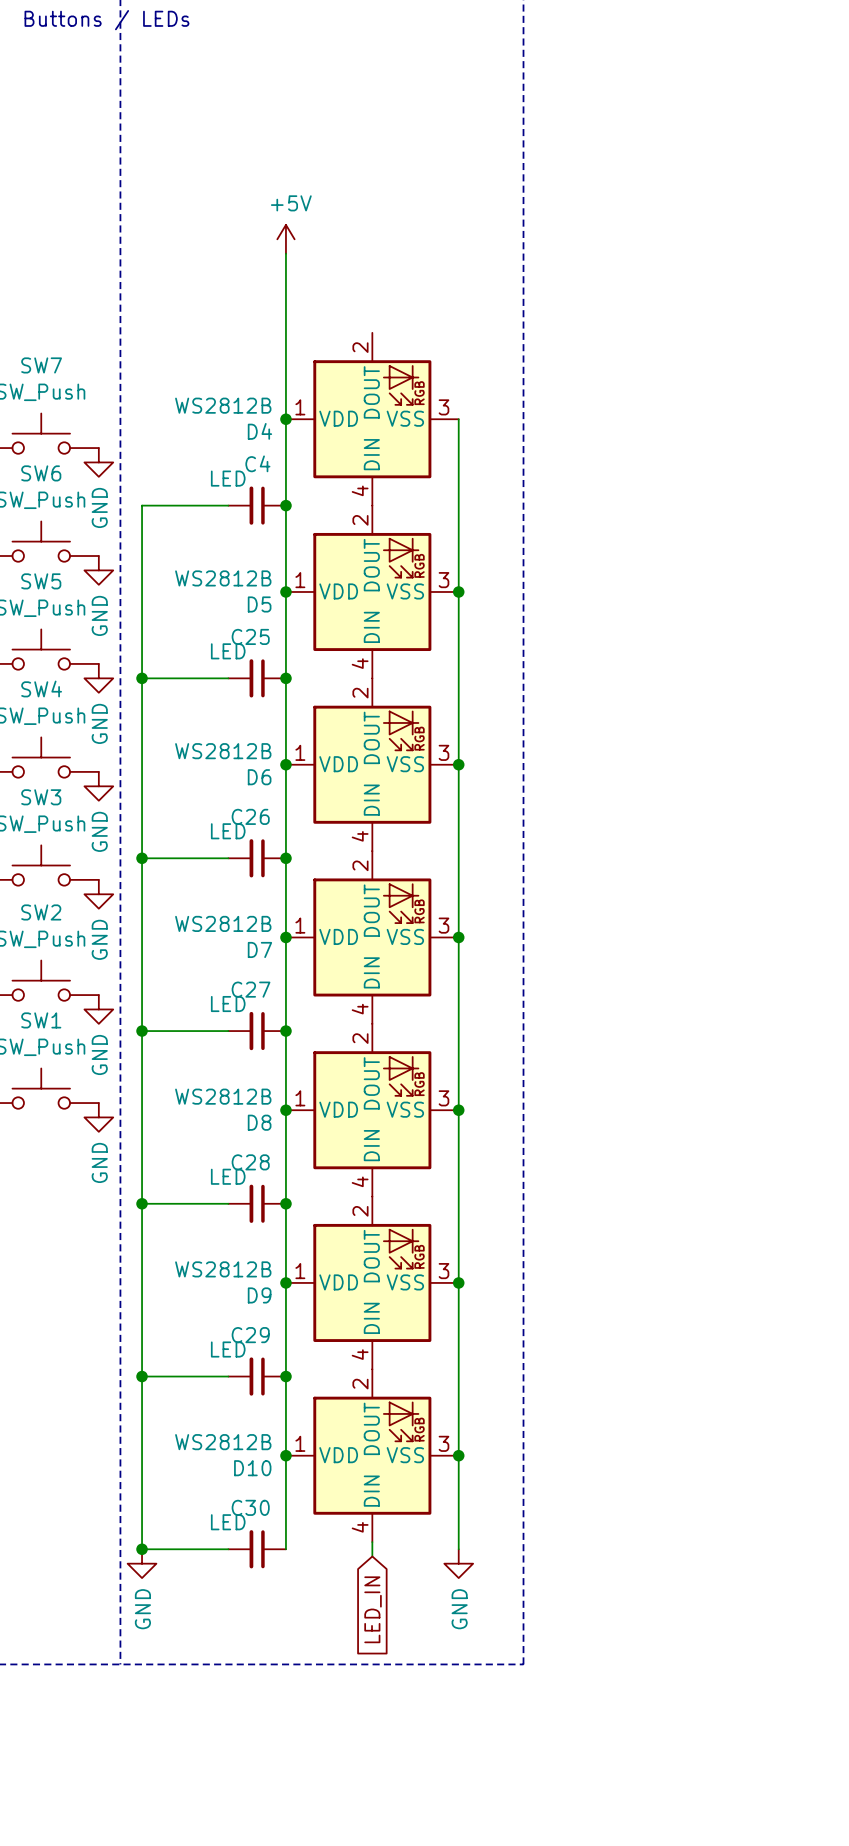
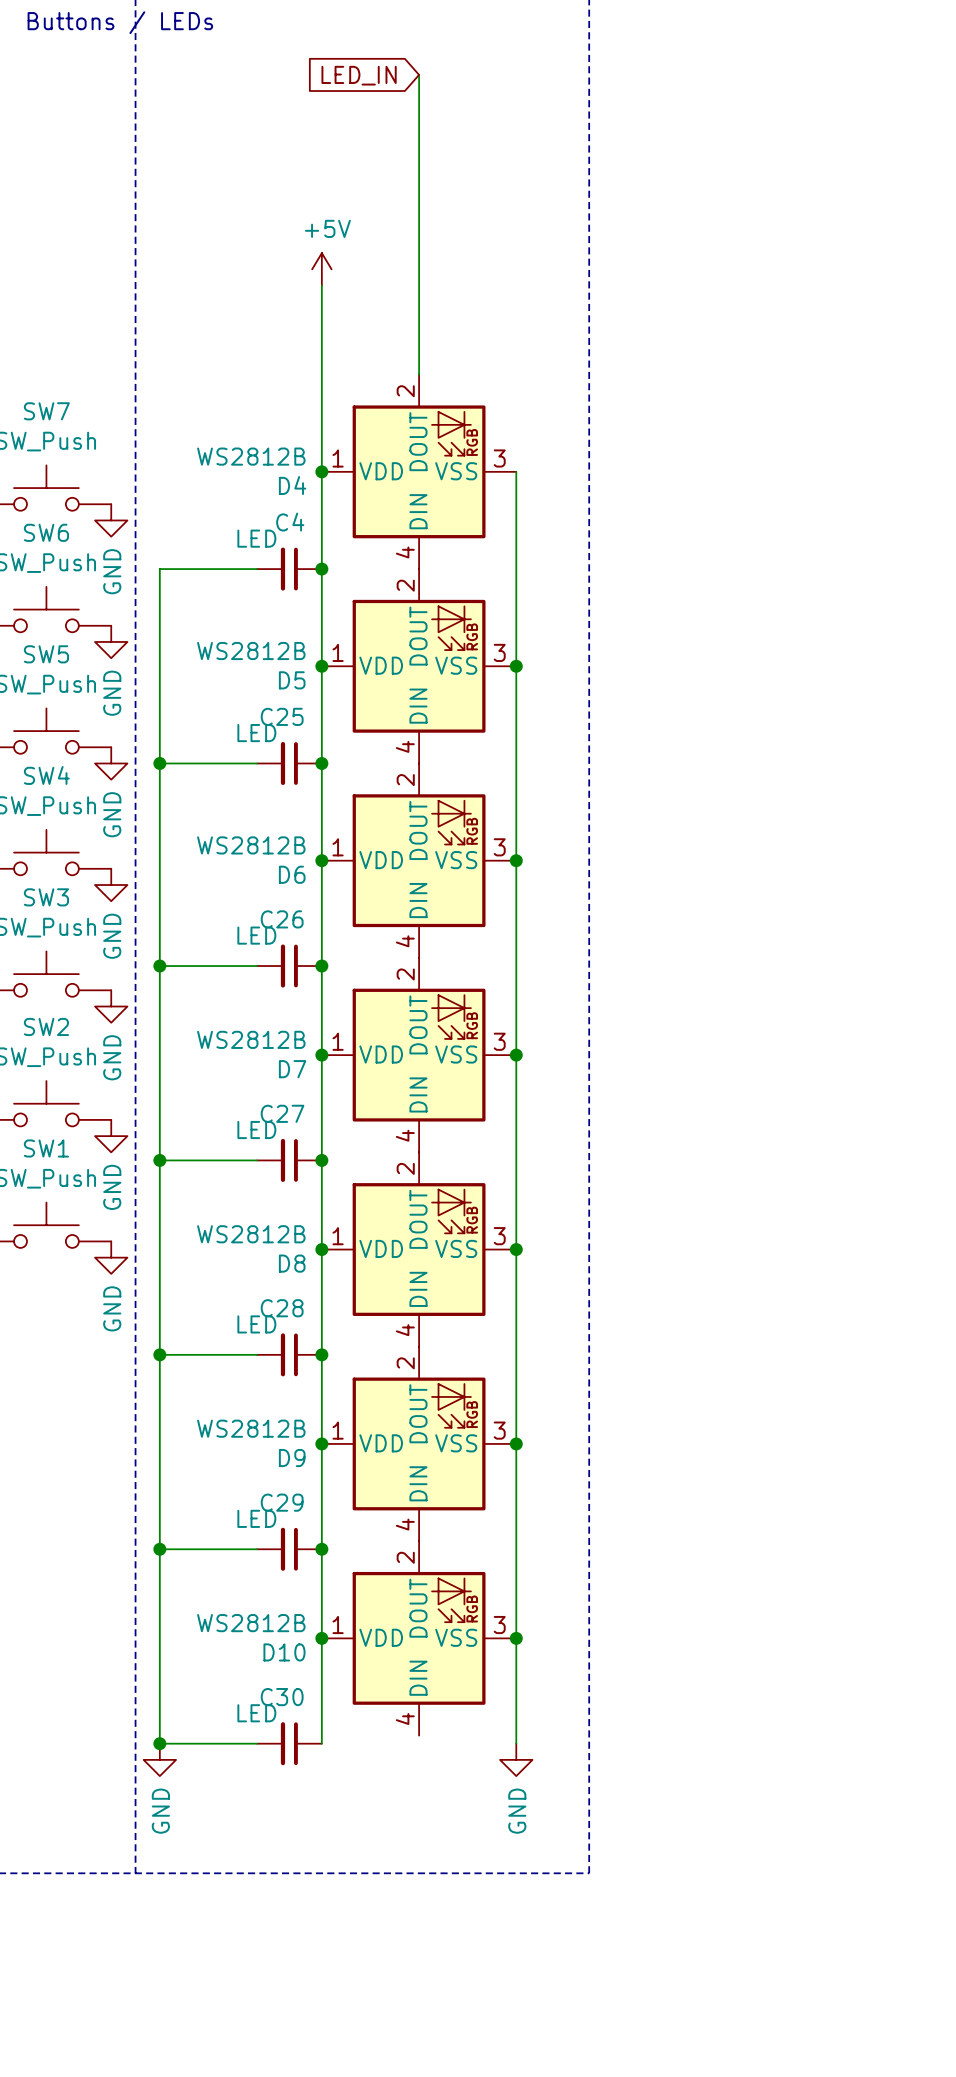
wire: none -> (419, 74) (419, 374)
global label: none -> LED_IN (359, 75)
wire: (372, 1542) (372, 1556) -> none
global label: LED_IN (373, 1609) -> none

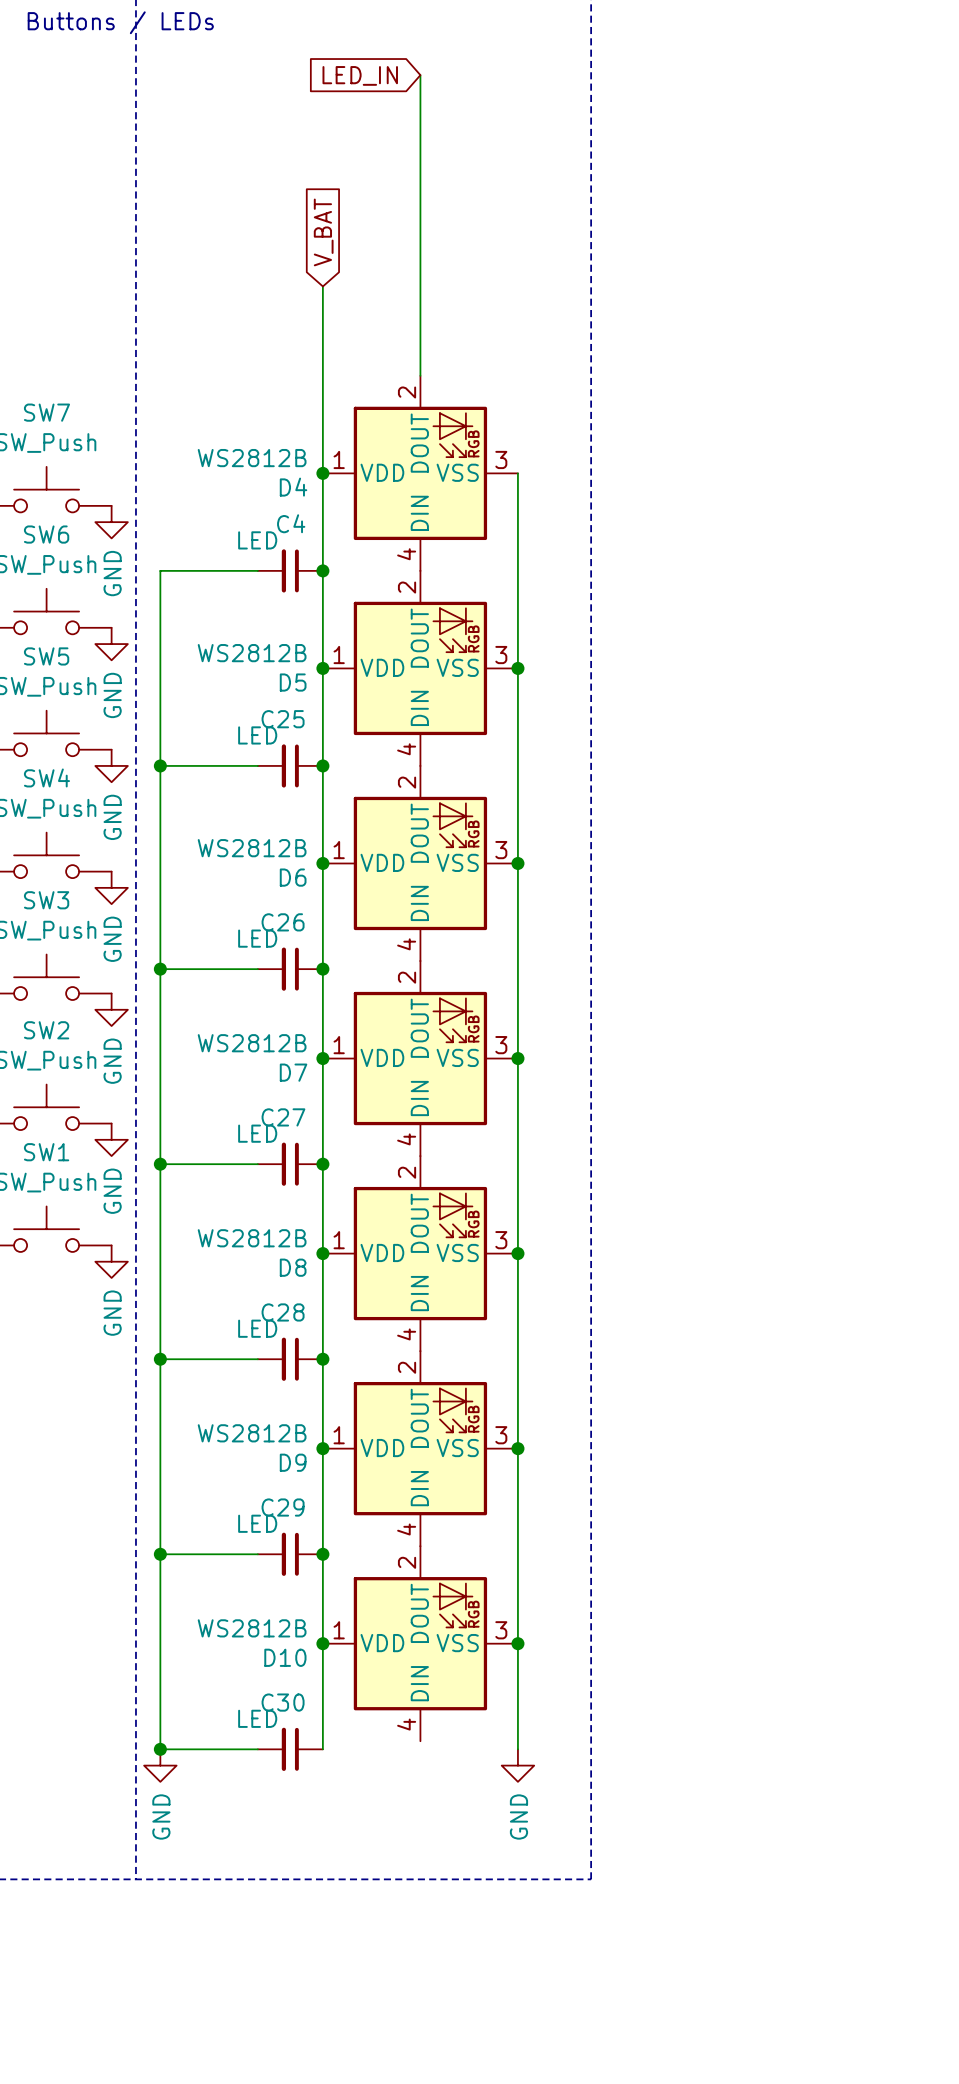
global label: none -> V_BAT (323, 232)
power symbol: +5V (321, 269) -> none

